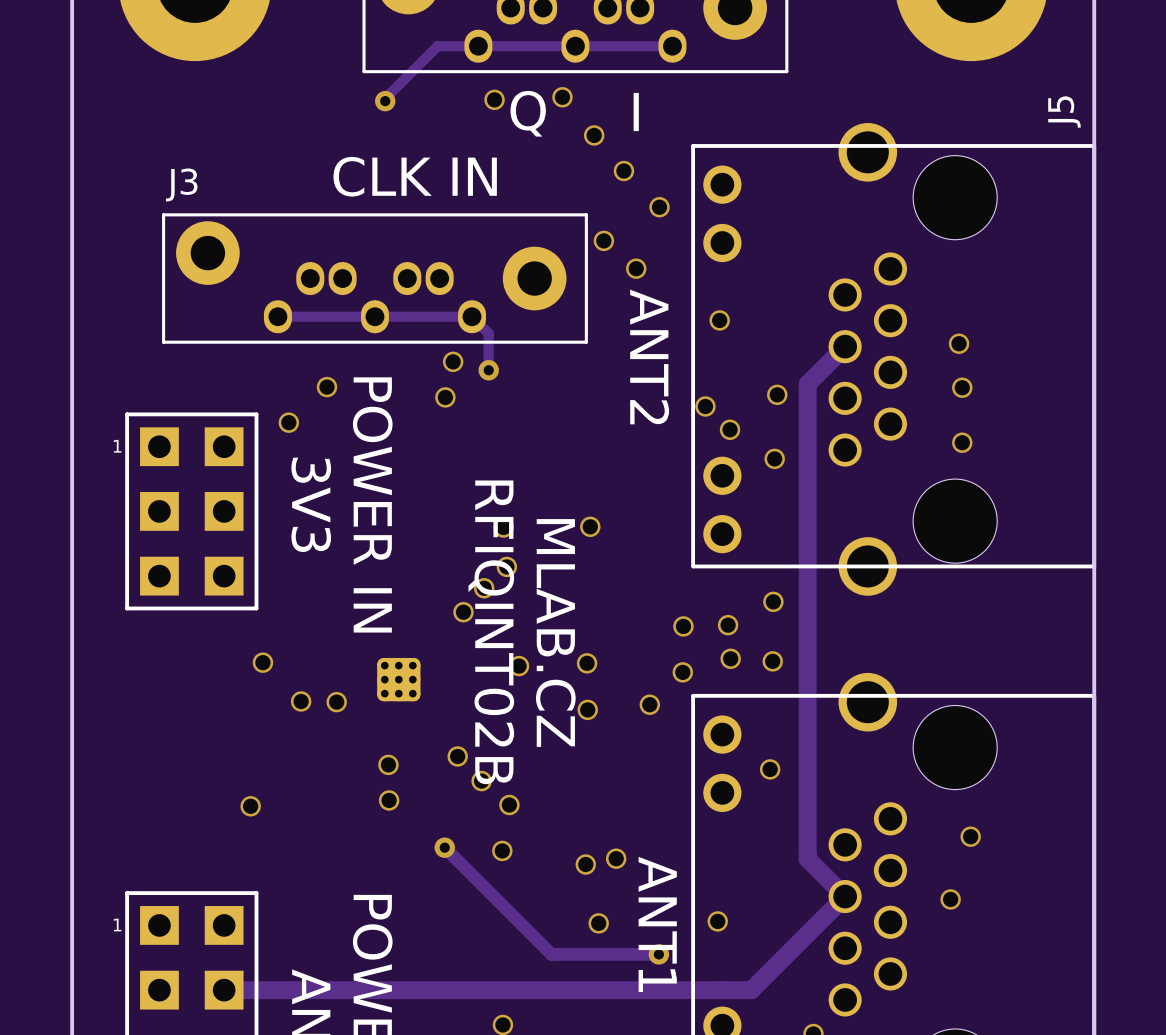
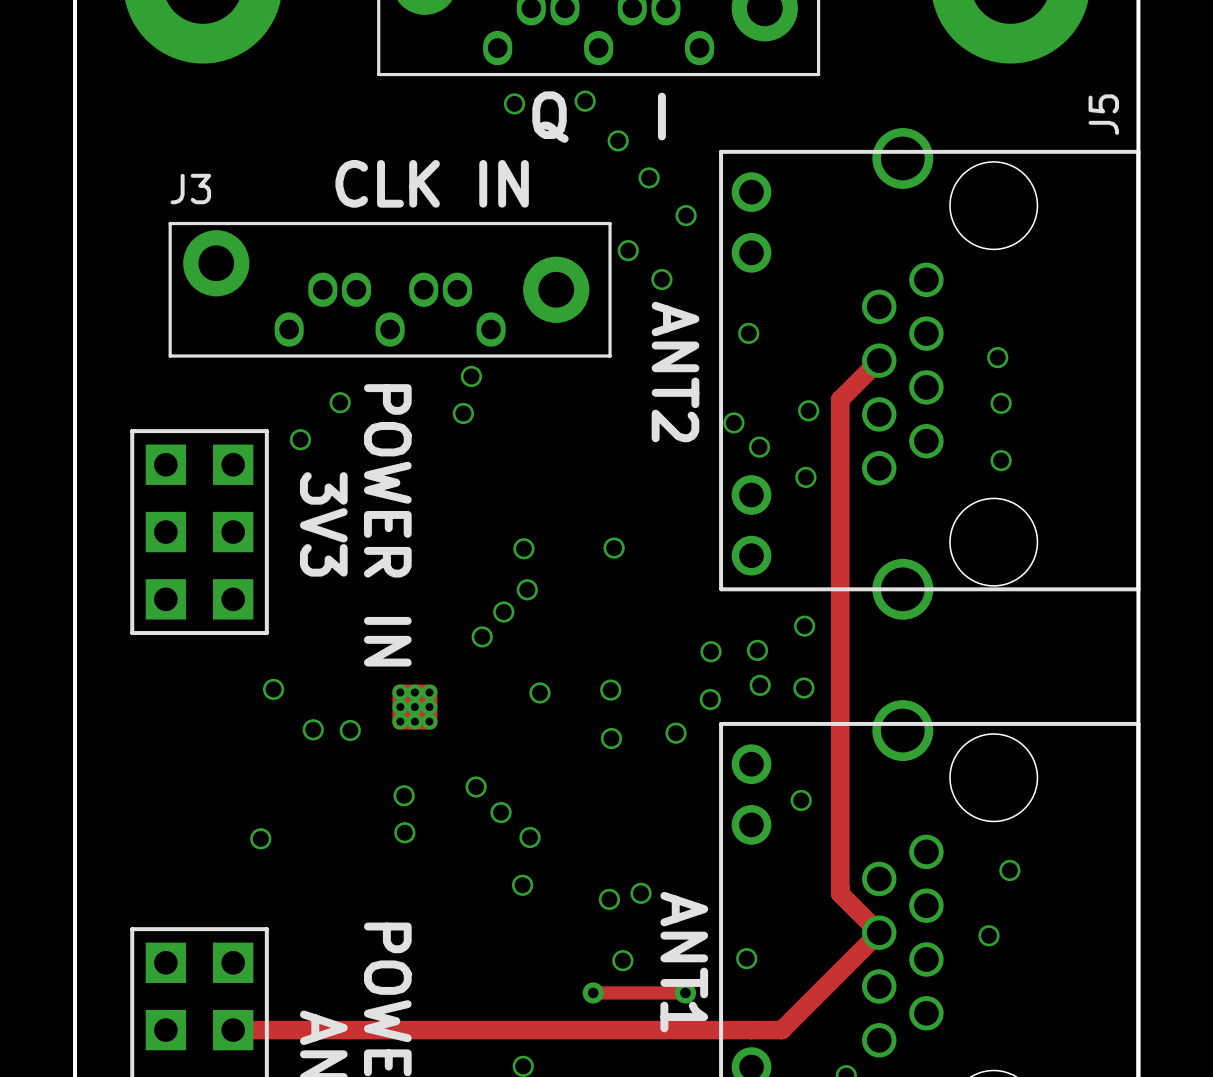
track: (672, 46) (437, 46) (385, 98) (385, 101) -> none
via: (385, 101) -> none
track: (277, 316) (472, 316) (488, 333) (488, 370) -> none
via: (488, 370) -> none
part text: 1 (117, 446) -> none
text: RFIQINT02B (491, 632) -> none
text: MLAB.CZ (555, 633) -> none
track: (444, 847) (551, 954) (570, 954) -> none
via: (444, 847) -> none
part text: 1 (117, 924) -> none
via: none -> (593, 992)

